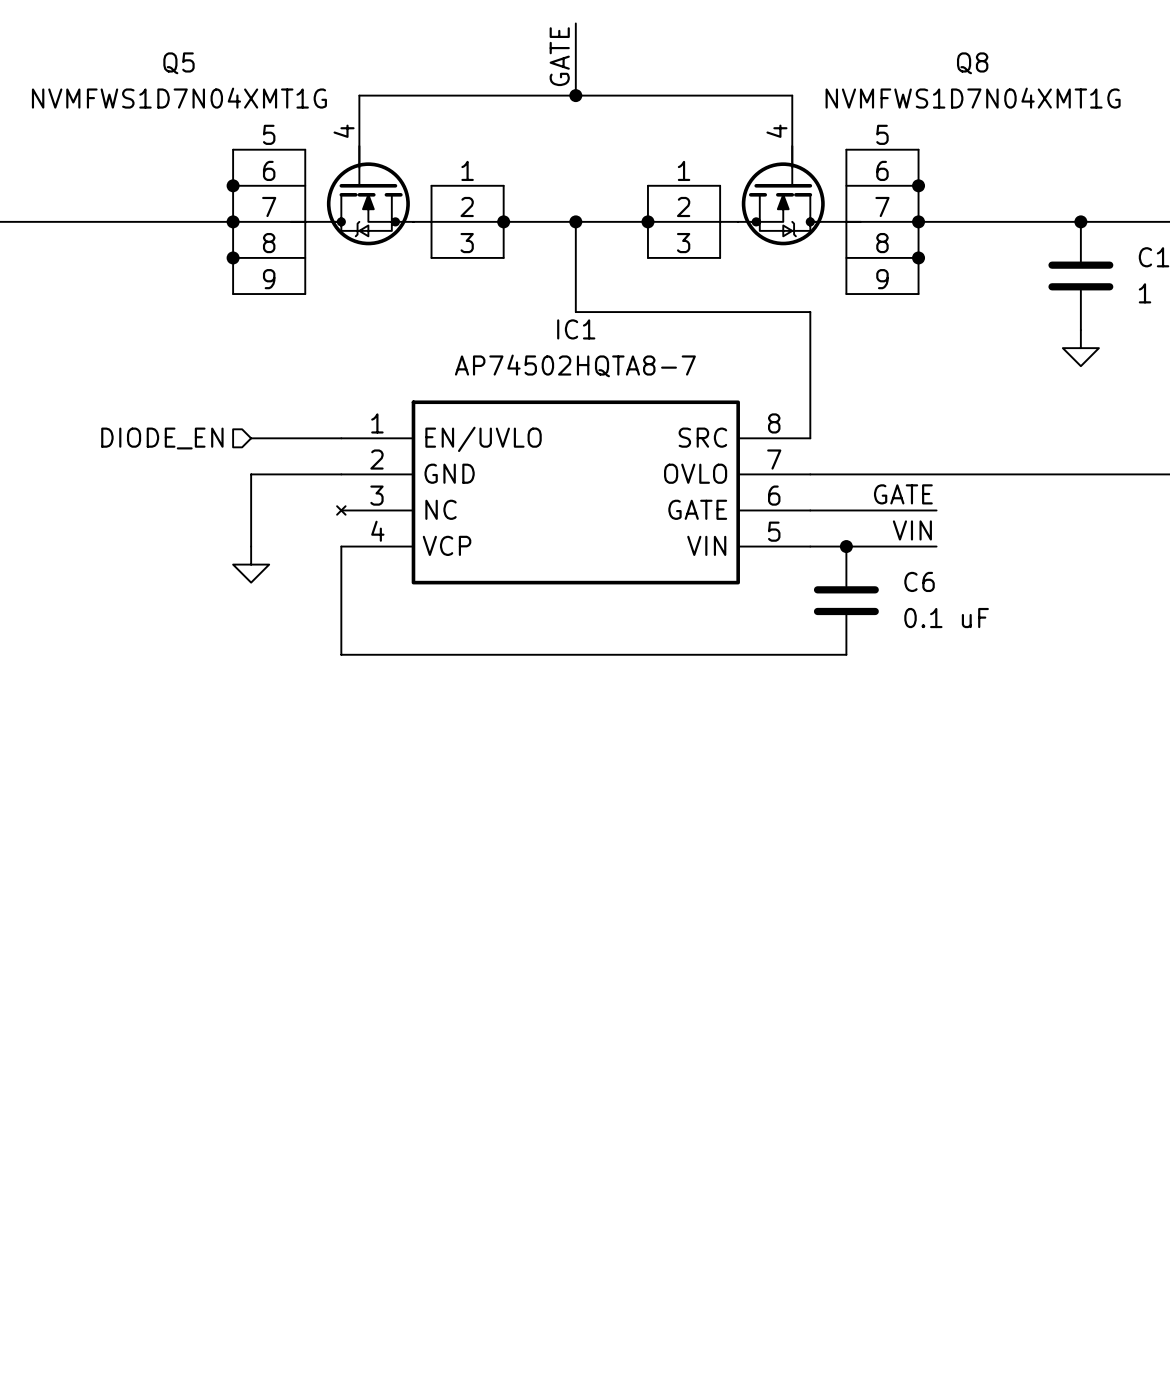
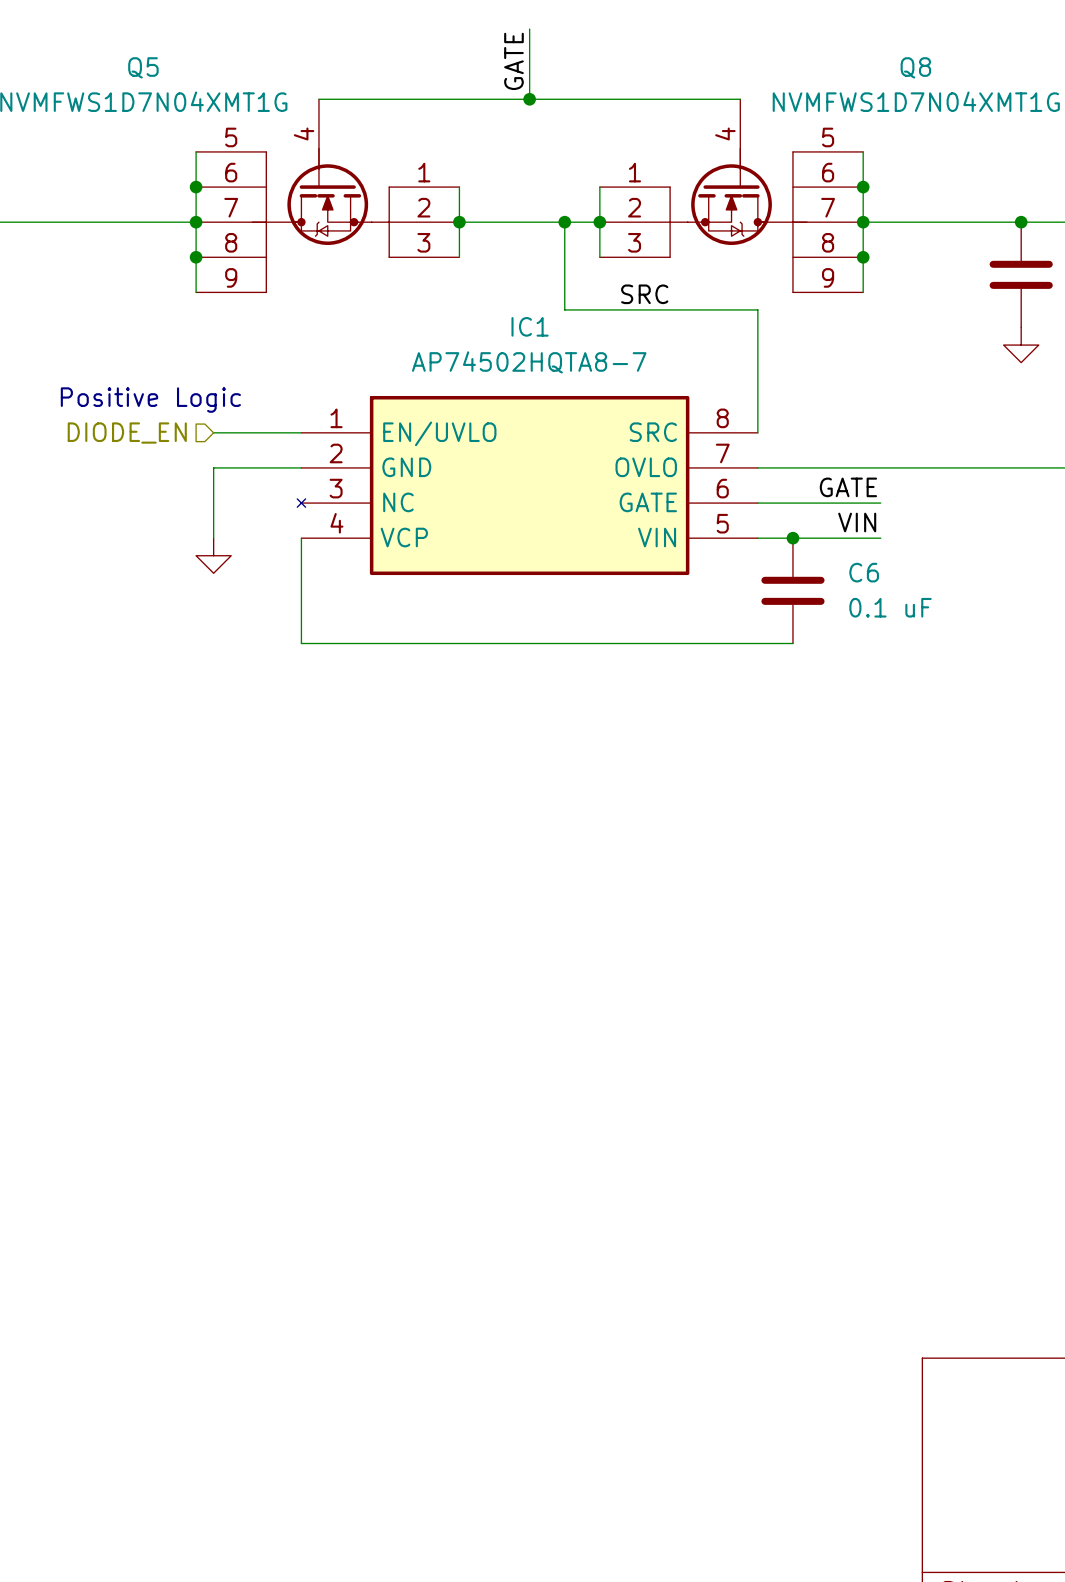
wire: (575, 221) (575, 312) (611, 312) -> (564, 222) (564, 309)
junction position: (575, 221) -> (564, 222)
label: none -> SRC (644, 294)
text: none -> Positive Logic (150, 400)

